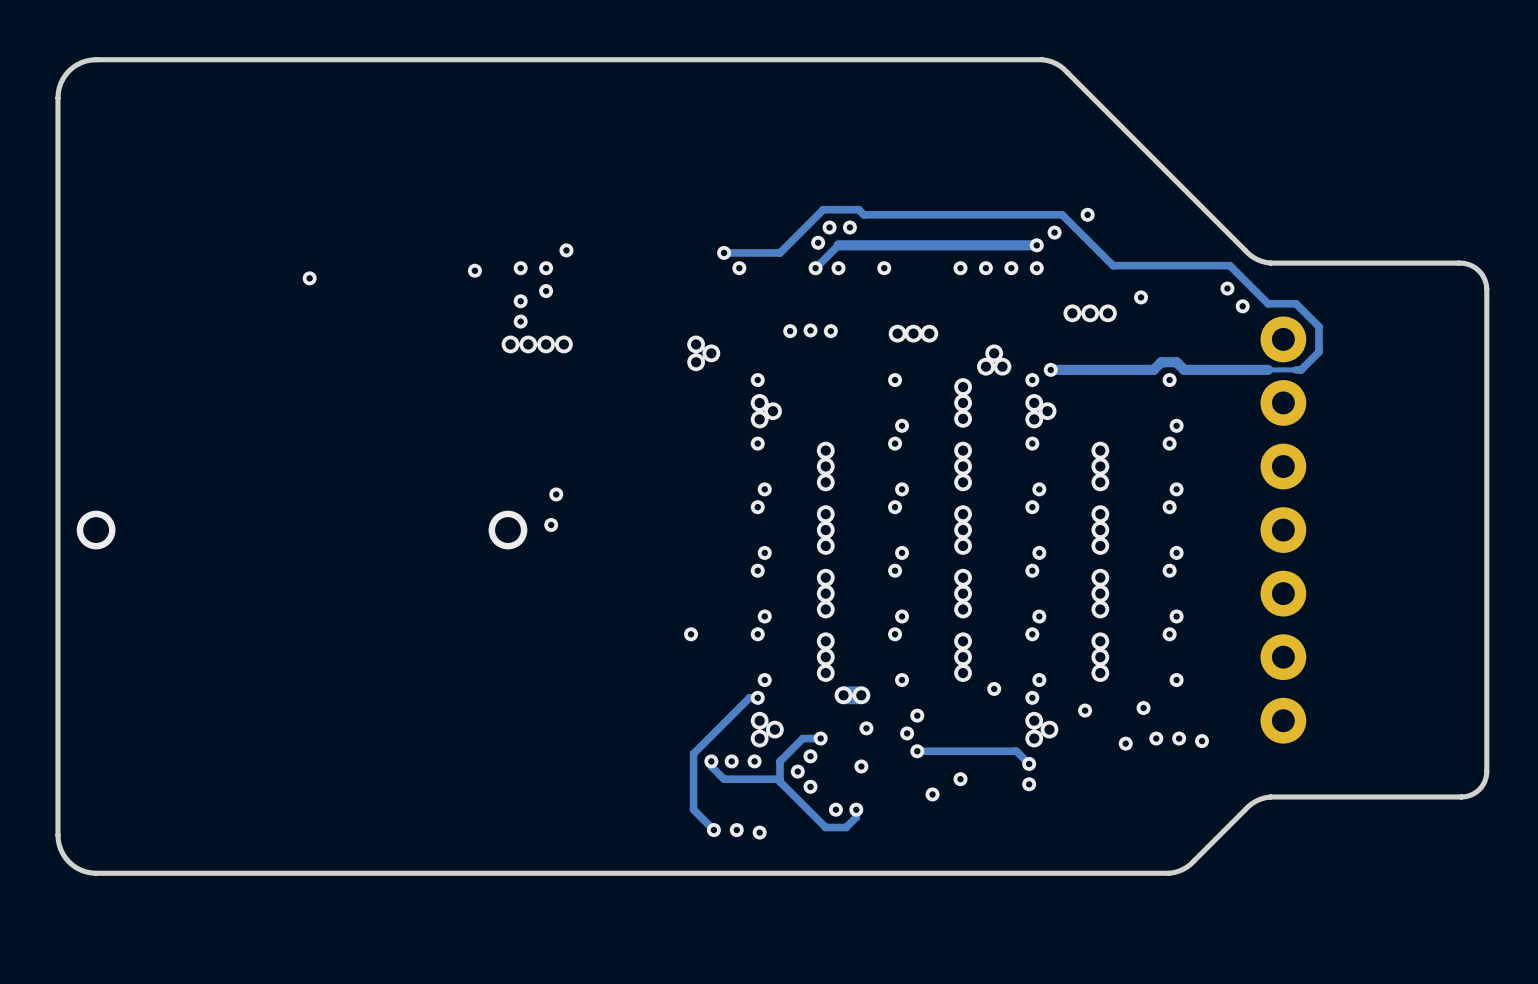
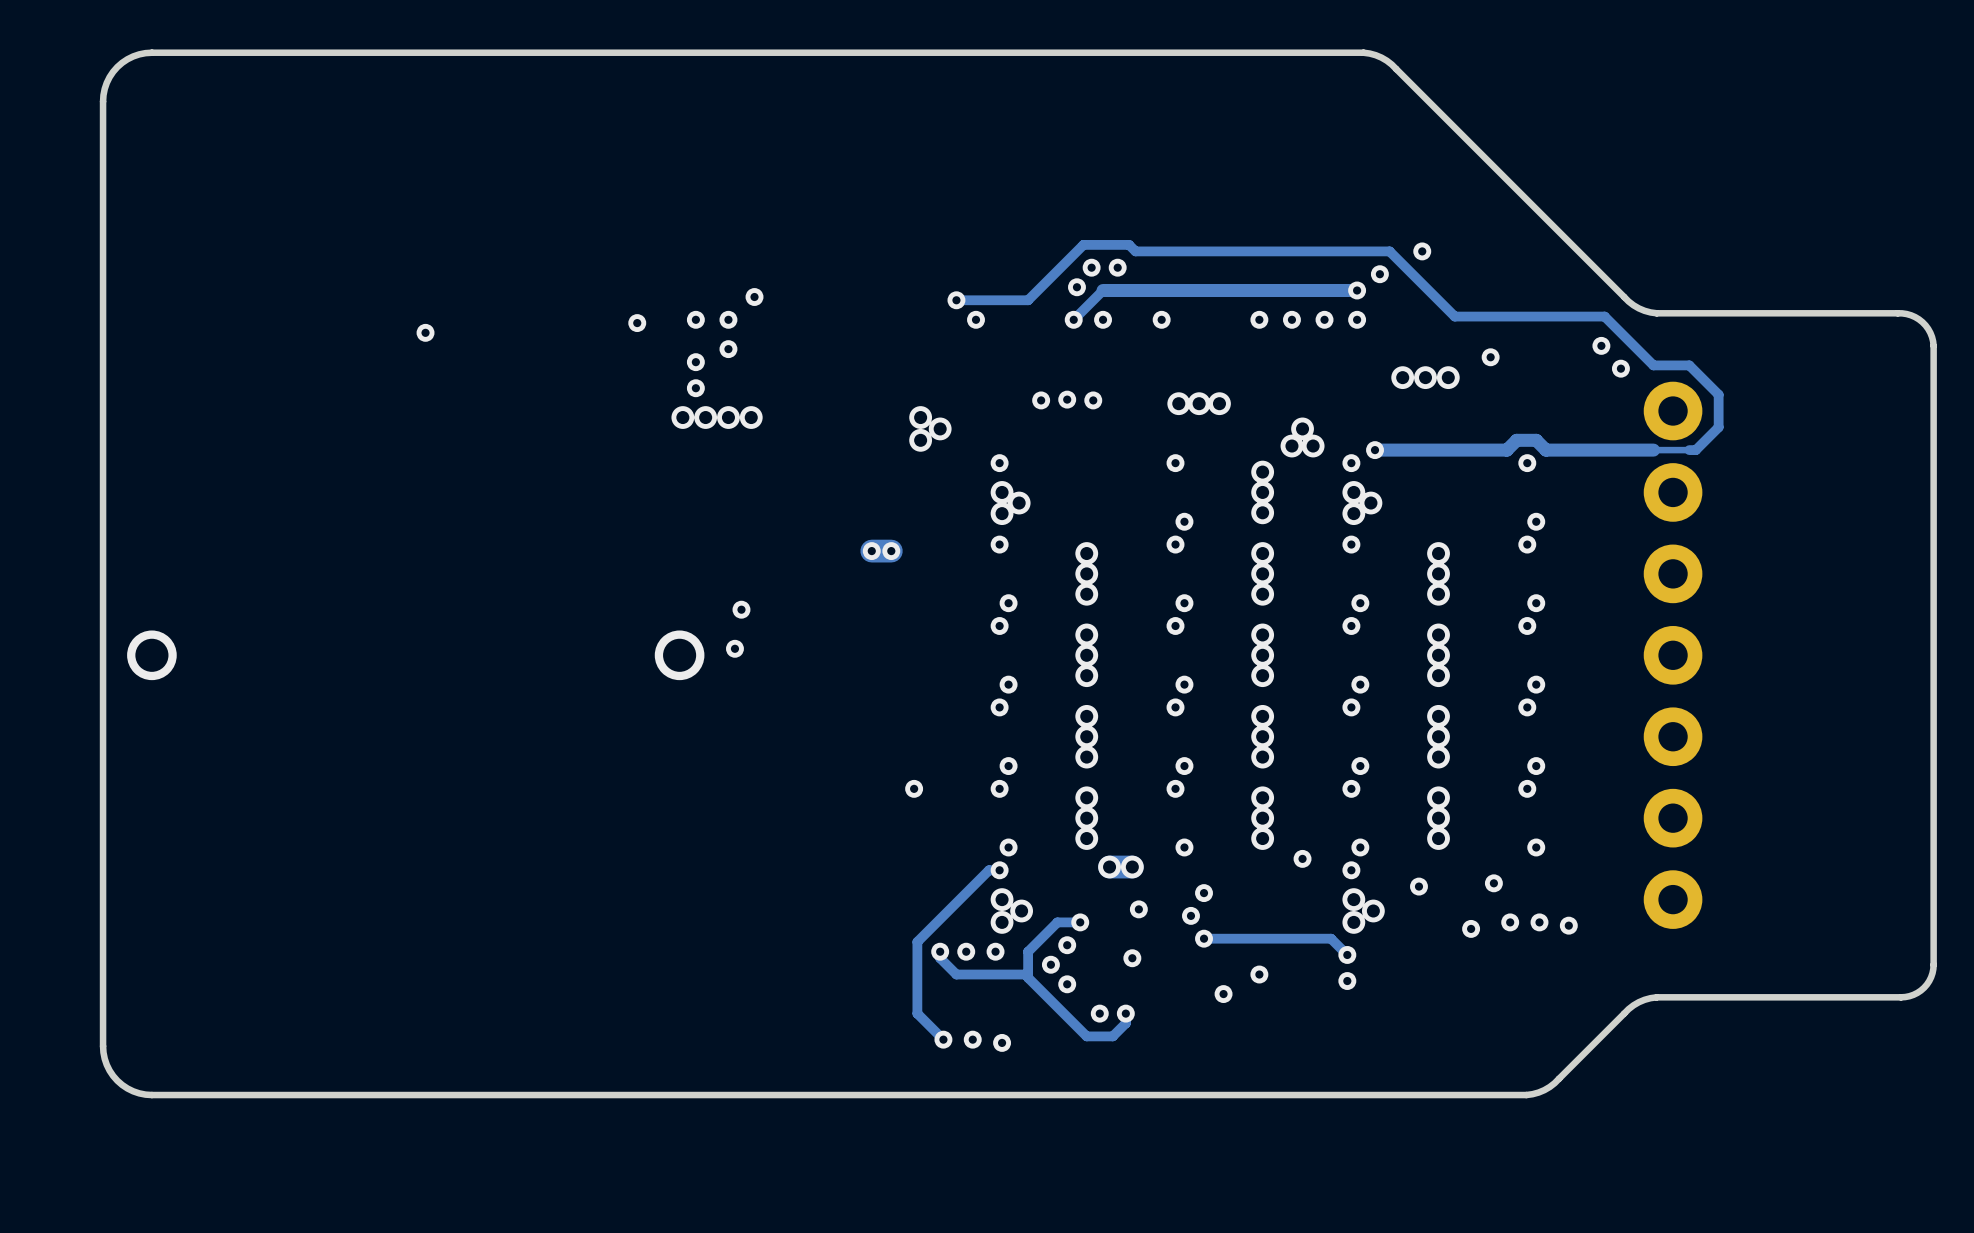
via: none -> (871, 551)
track: none -> (891, 551) (871, 551)
via: none -> (891, 551)

